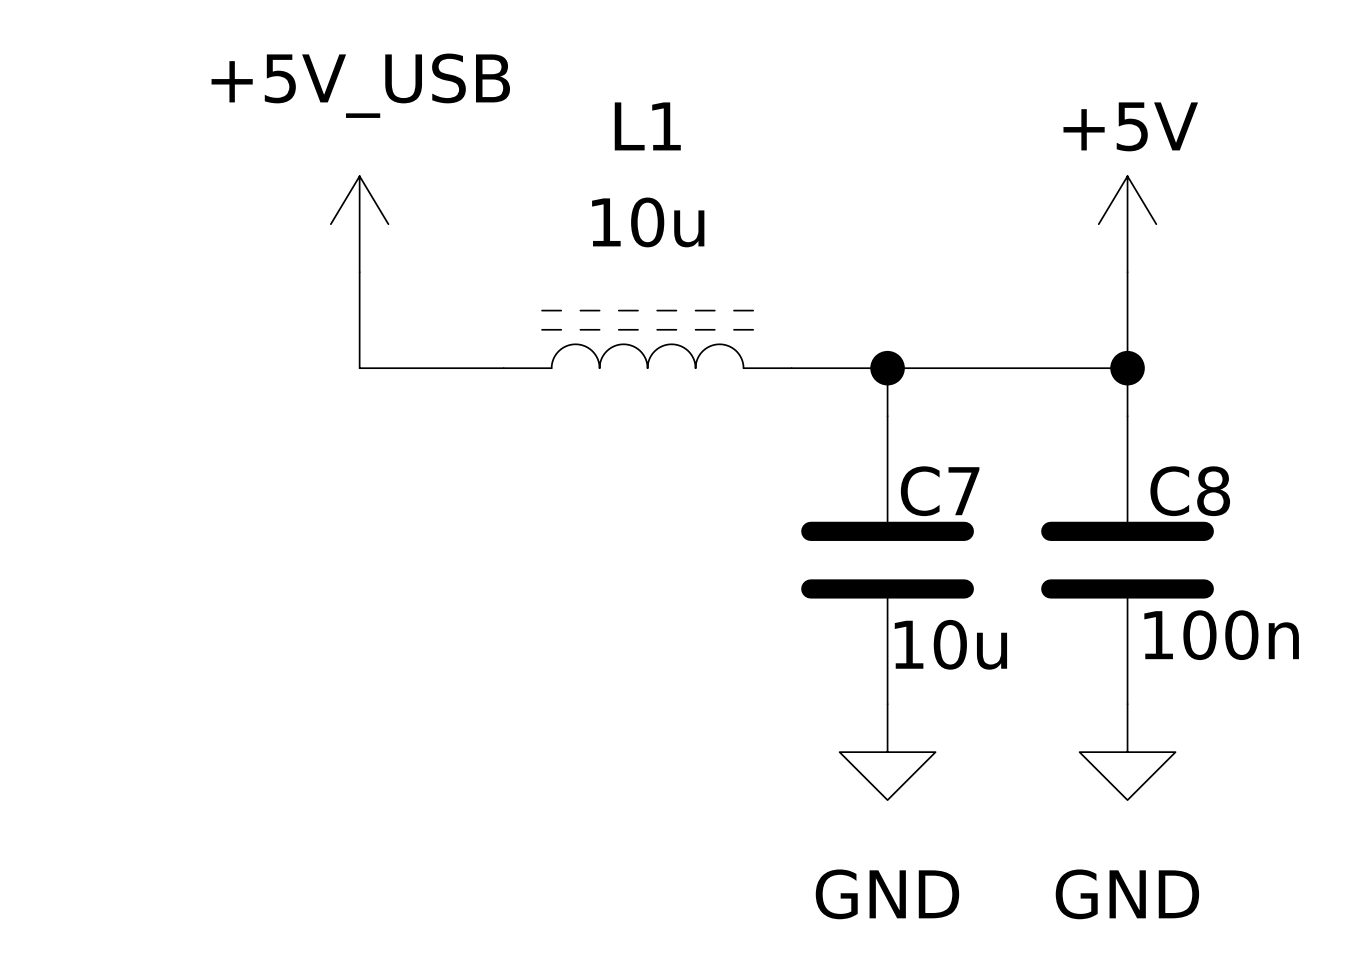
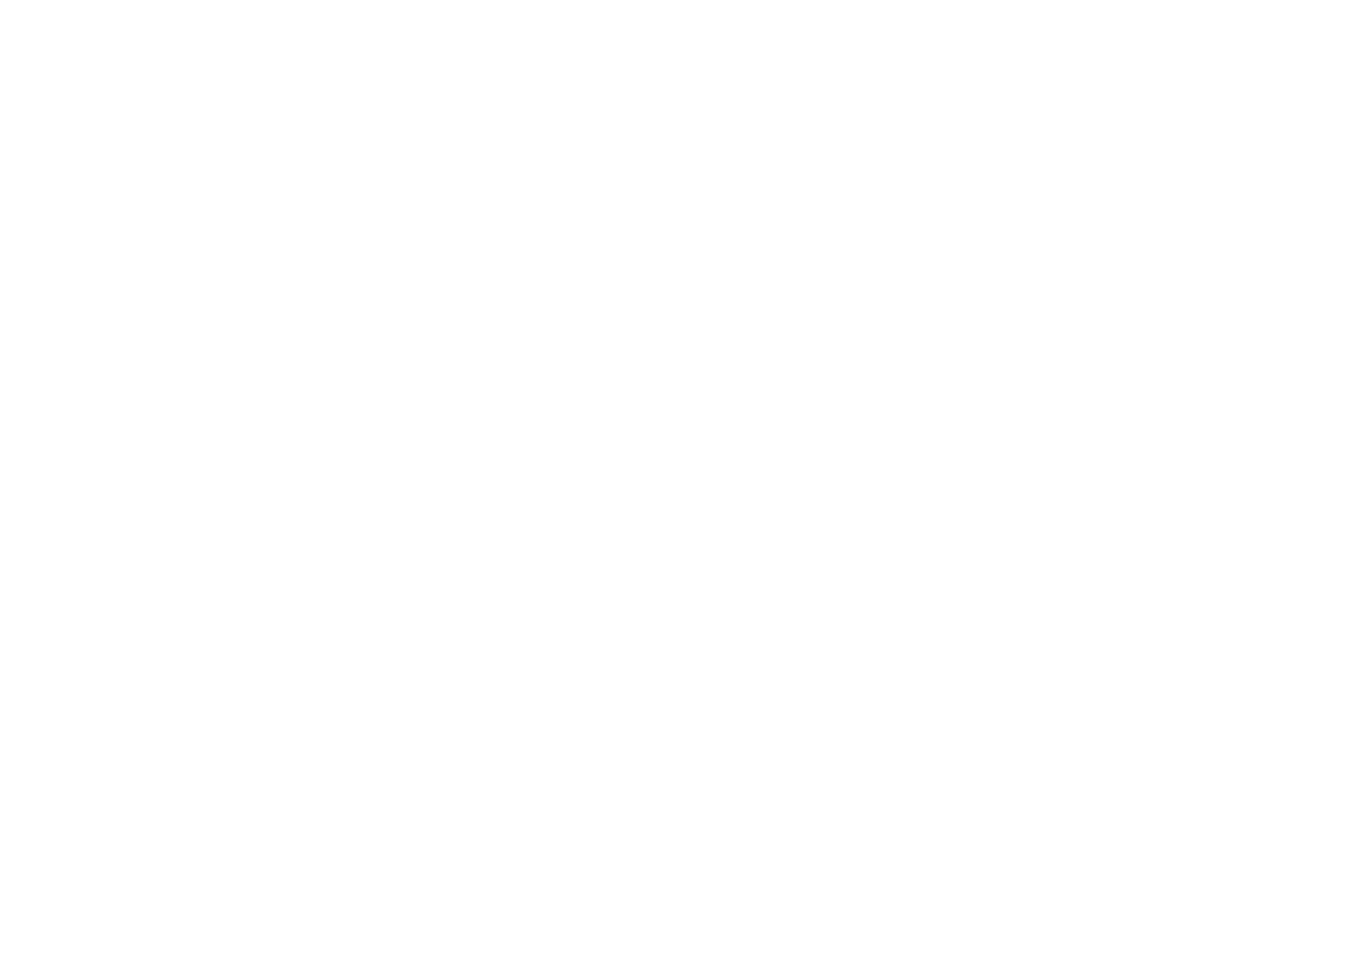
power symbol: +5V_USB (359, 224) -> none
power symbol: +5V (1127, 224) -> none
wire: (359, 272) (359, 368) (503, 368) -> none
wire: (1127, 272) (1127, 416) -> none
L1: 10u (647, 339) -> none
wire: (791, 368) (1127, 368) -> none
wire: (887, 368) (887, 416) -> none
junction: (887, 368) -> none
junction: (1127, 368) -> none
C7: 10u (887, 560) -> none
C8: 100n (1127, 560) -> none
power symbol: GND (887, 752) -> none
power symbol: GND (1127, 752) -> none

